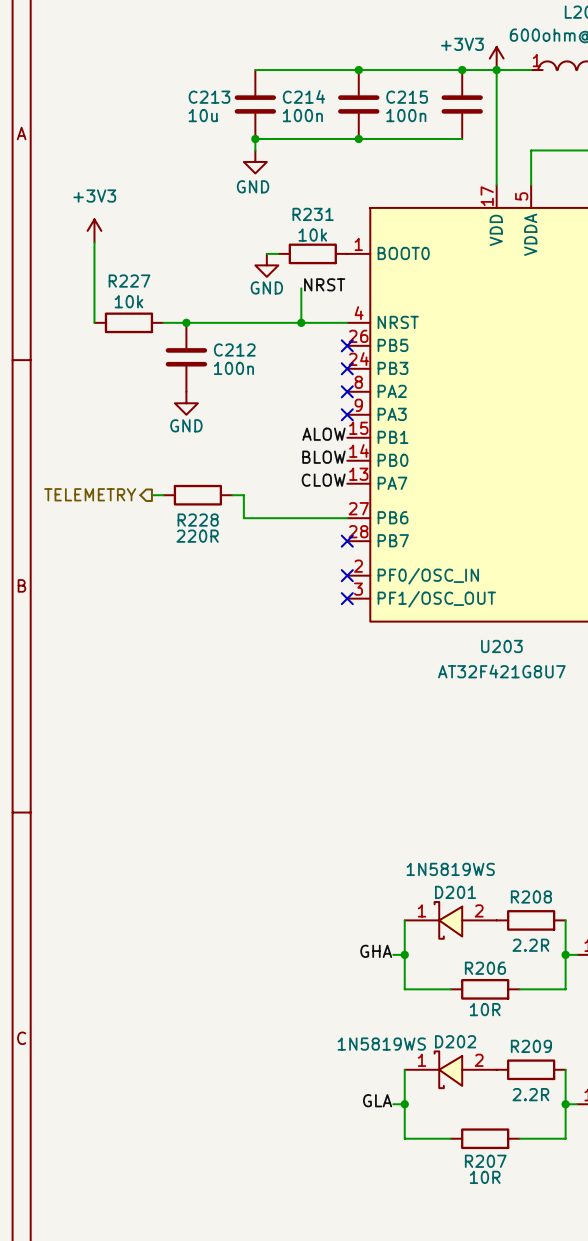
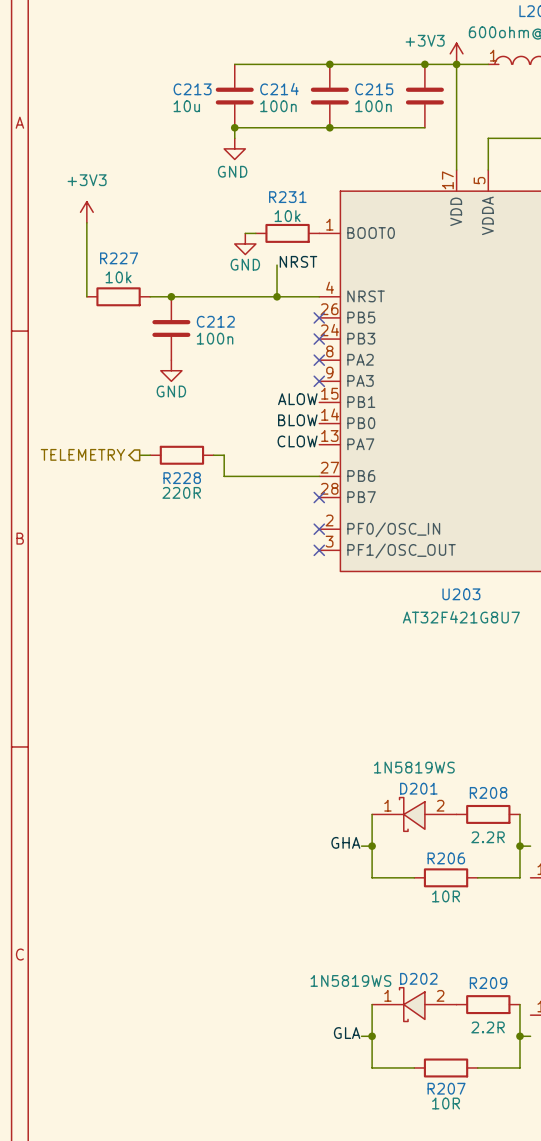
wire: none -> (372, 814) (372, 846) (361, 846)
wire: none -> (519, 814) (519, 846) (530, 846)
D201 position: (450, 920) -> (414, 814)
R208 position: (531, 920) -> (488, 814)
label position: GHA (376, 951) -> GHA (345, 842)
wire: (393, 954) (404, 954) (404, 989) (450, 989) -> none
wire: none -> (372, 877) (414, 877)
junction position: (404, 954) -> (372, 846)
wire: none -> (477, 877) (519, 877)
junction position: (565, 954) -> (519, 846)
wire: (577, 954) (565, 954) (565, 989) (519, 989) -> none
R206 position: (485, 989) -> (446, 877)
wire: (404, 1069) (404, 1092) -> none
D202 position: (450, 1069) -> (414, 1004)
R209 position: (531, 1069) -> (488, 1004)
wire: (565, 1069) (565, 1092) -> none
label position: GLA (377, 1100) -> GLA (347, 1033)
wire: (393, 1104) (404, 1104) -> (361, 1036) (372, 1036)
junction position: (404, 1104) -> (372, 1036)
wire: (565, 1104) (577, 1104) -> (519, 1036) (530, 1036)
junction position: (565, 1104) -> (519, 1036)
wire: (404, 1138) (450, 1138) -> (372, 1046) (372, 1067) (414, 1067)
R207 position: (485, 1138) -> (446, 1067)
wire: (519, 1138) (565, 1138) -> (477, 1067) (519, 1067) (519, 1046)

